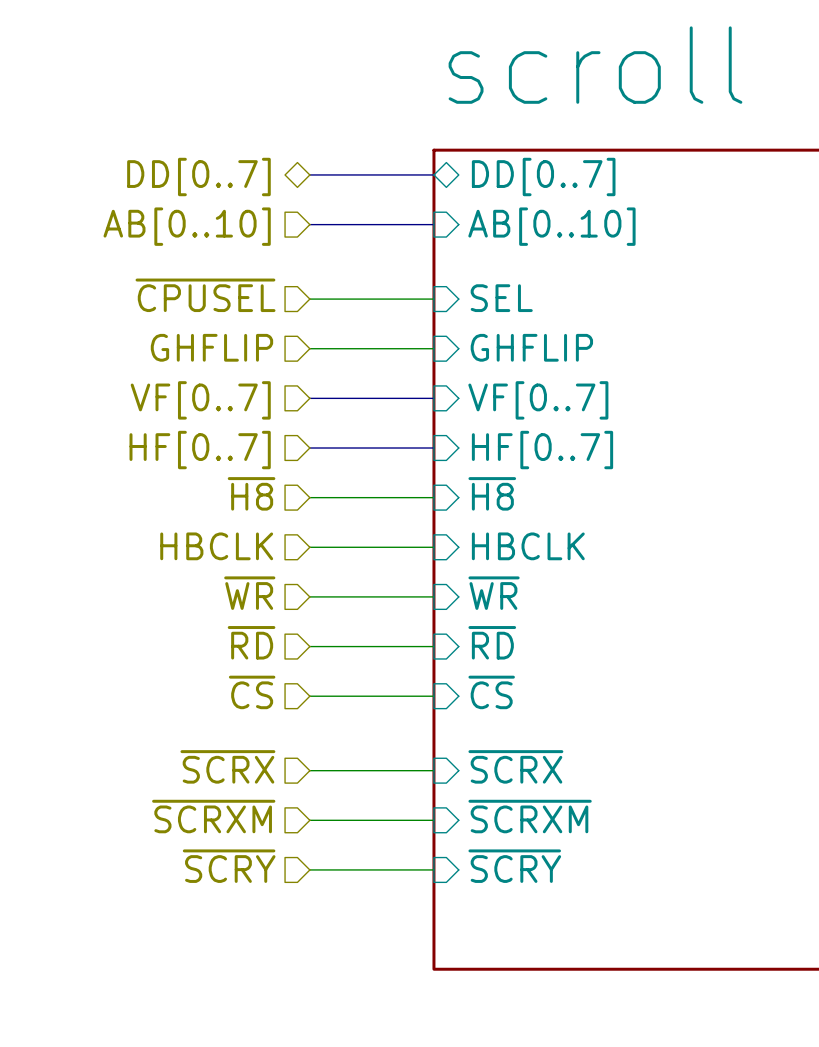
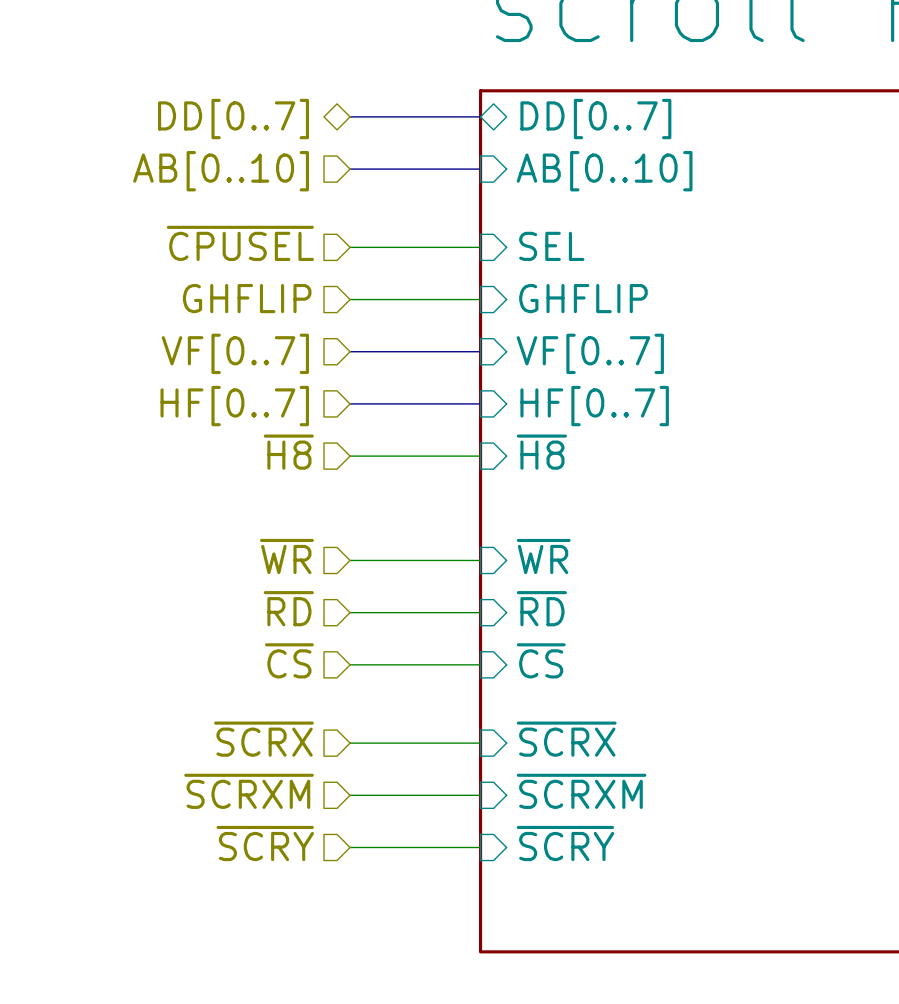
hierarchical label: HBCLK (216, 546) -> none
sheet pin: HBCLK (528, 546) -> none
wire: (309, 547) (433, 547) -> none

